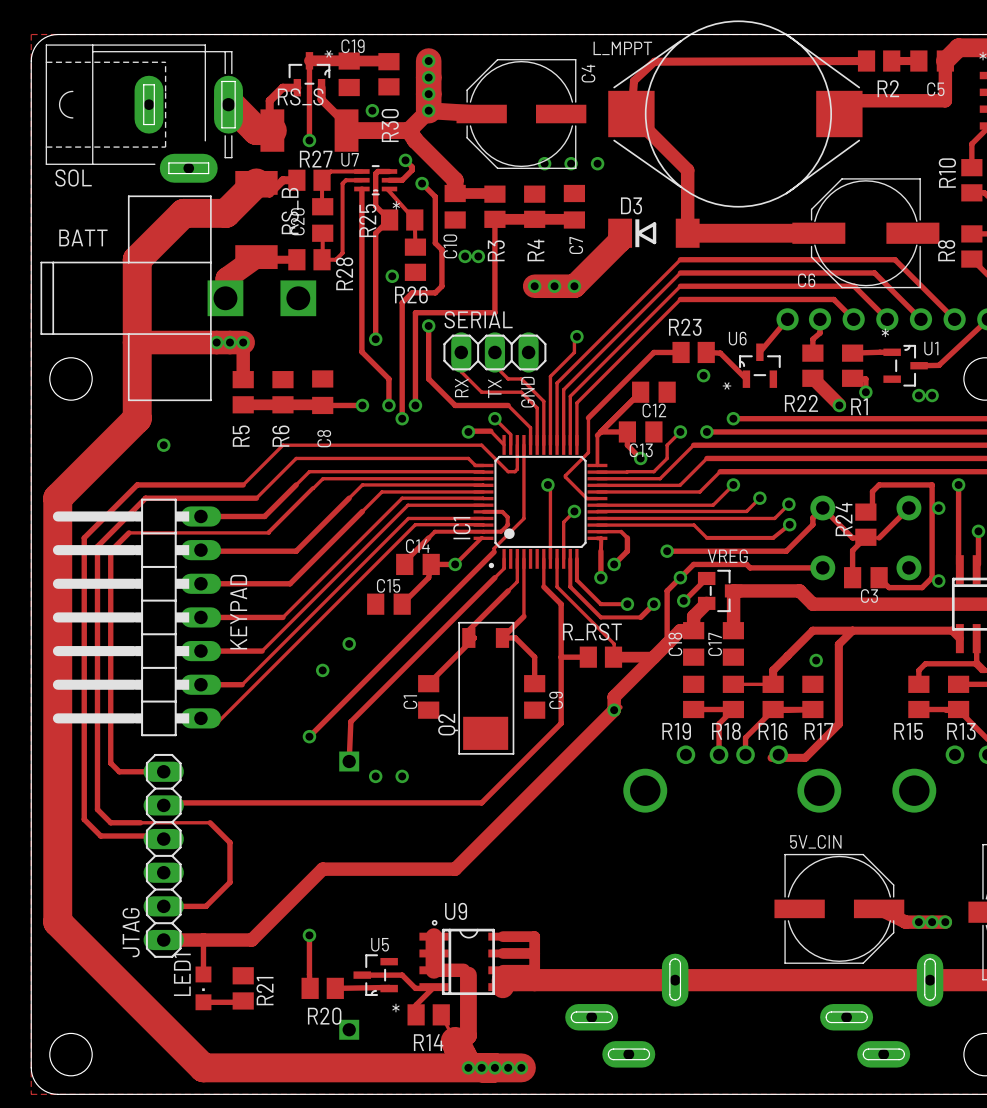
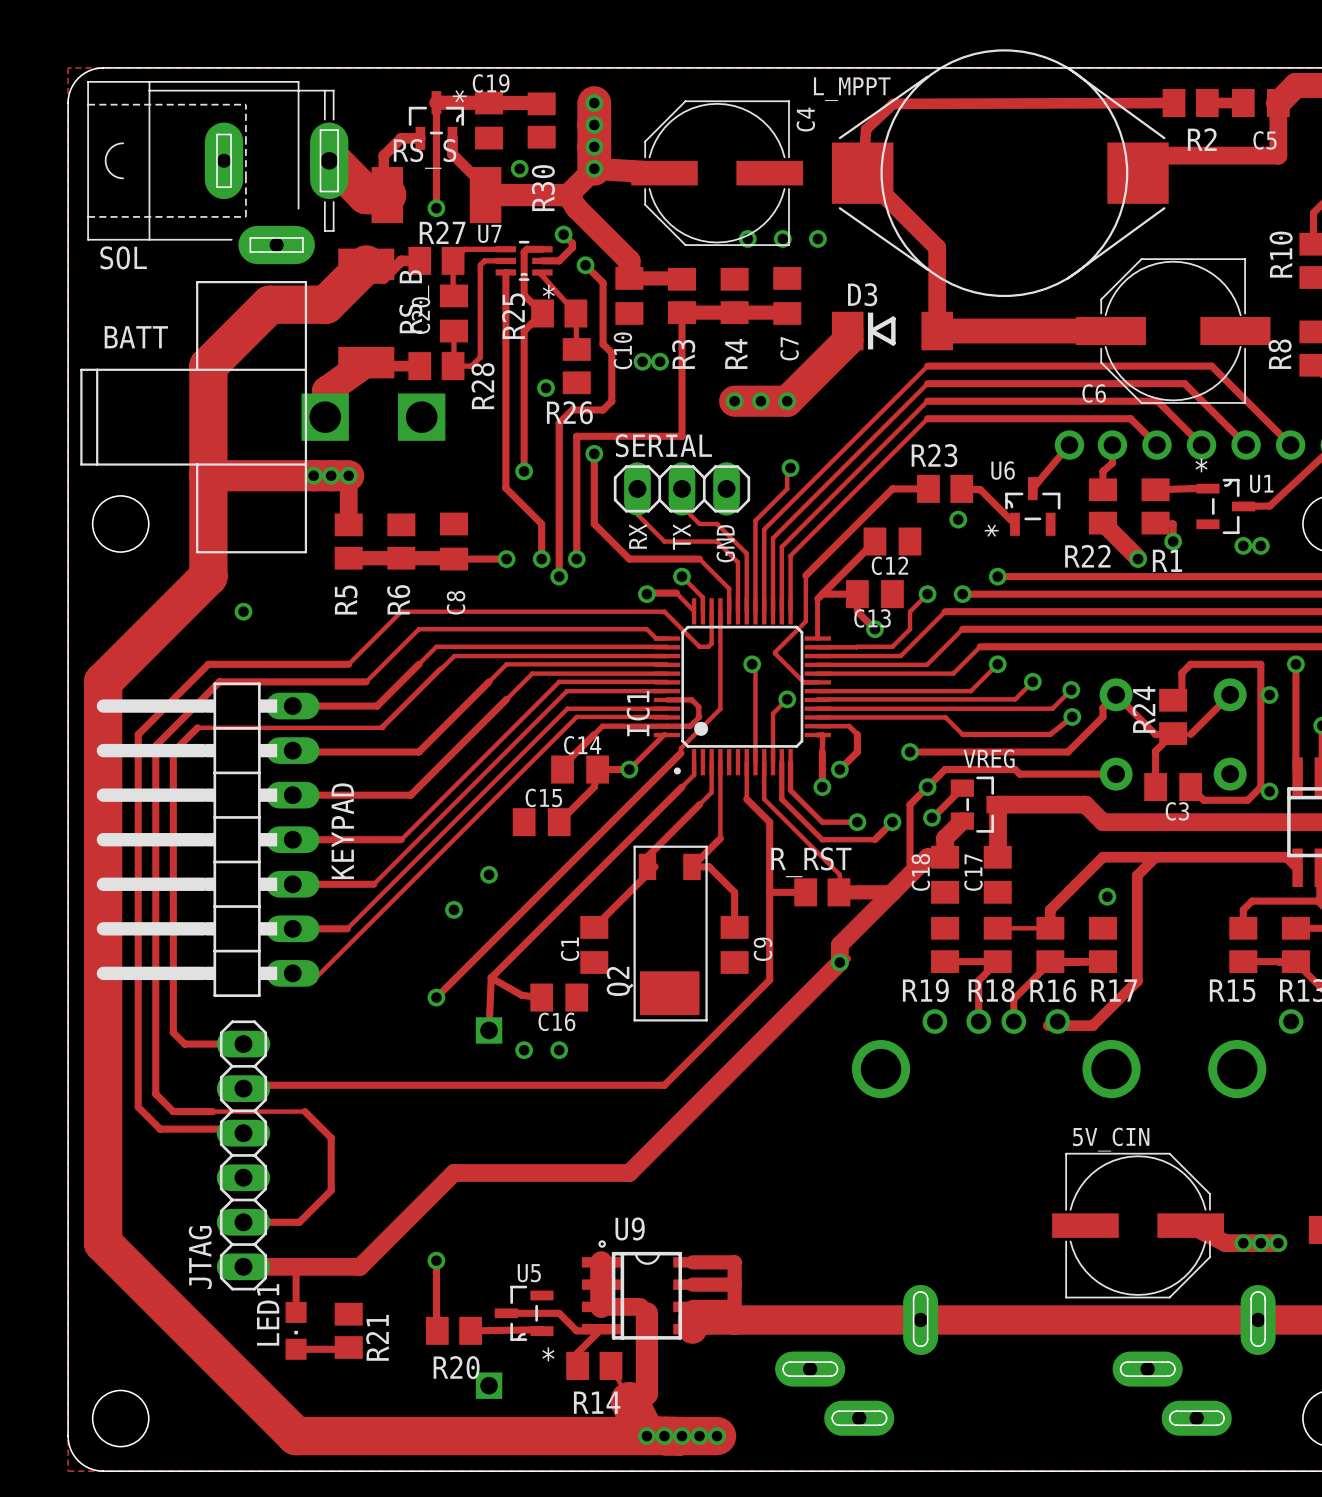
track: none -> (491, 977) (521, 995) (541, 997)
C16: none -> (559, 997)

